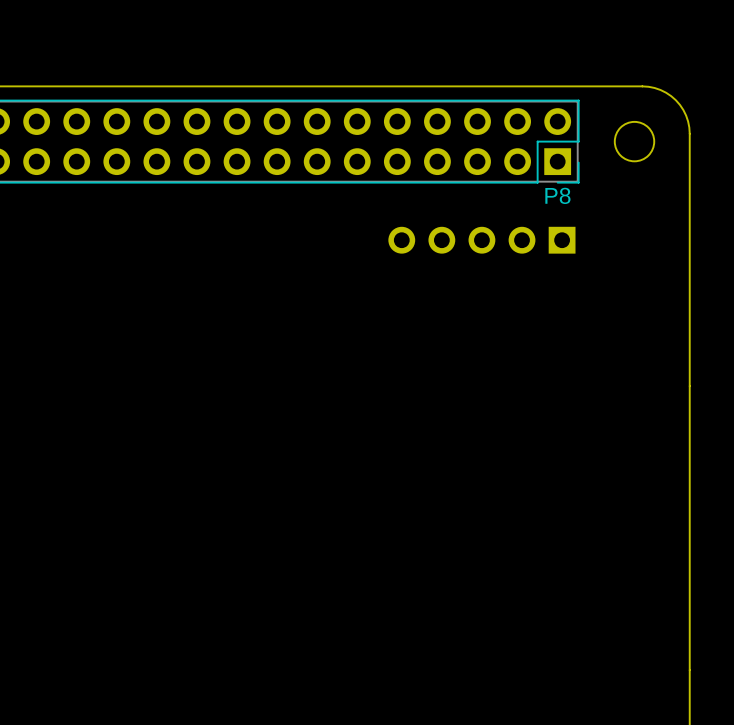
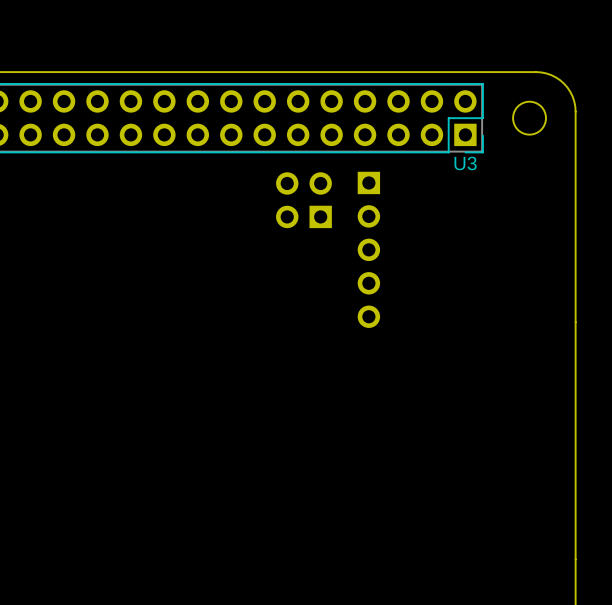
P8 name: P8 (557, 195) -> U3 (465, 163)
part: none -> (303, 200)
part rotation: 0° (481, 240) -> 90° counterclockwise (368, 249)

